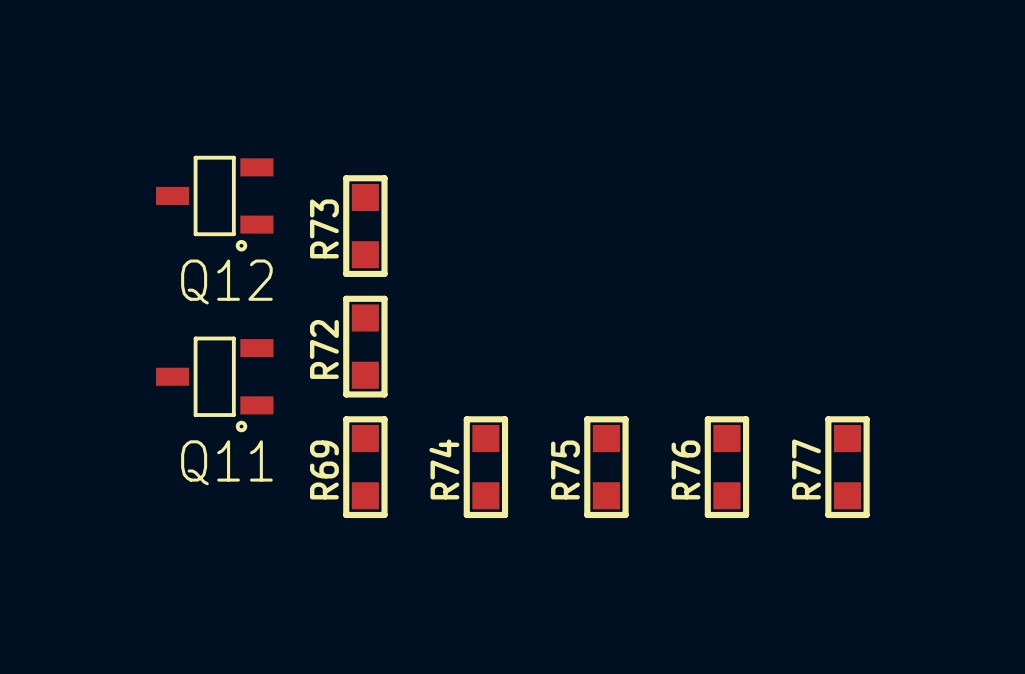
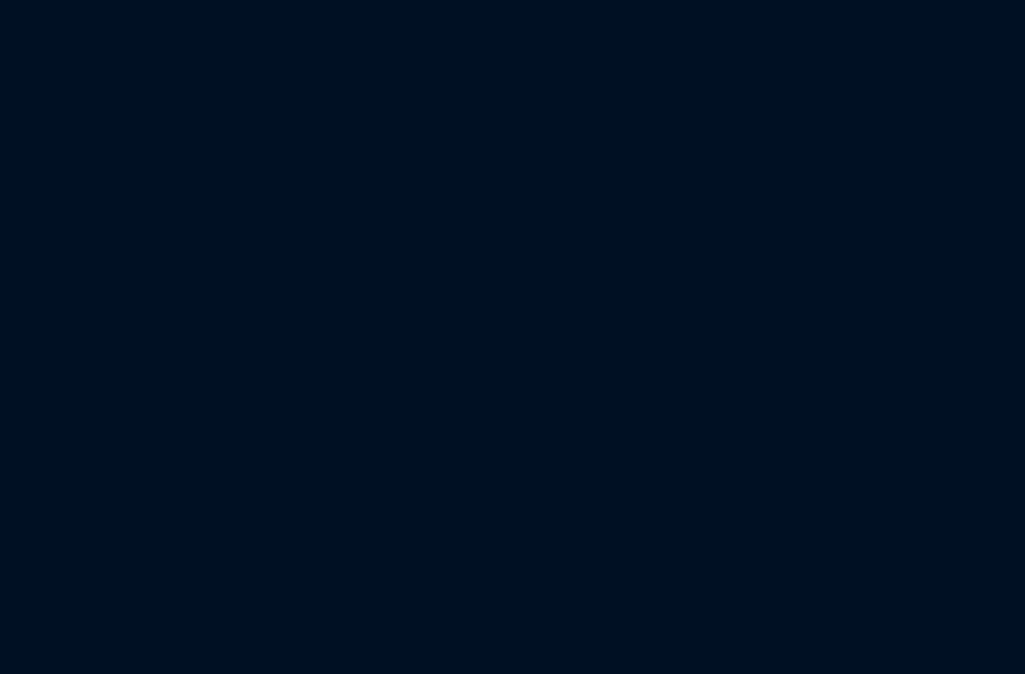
Q12: (214, 203) -> none
R73: (365, 226) -> none
R72: (365, 346) -> none
Q11: (214, 384) -> none
R69: (365, 467) -> none
R74: (485, 467) -> none
R75: (606, 467) -> none
R76: (726, 467) -> none
R77: (847, 467) -> none

